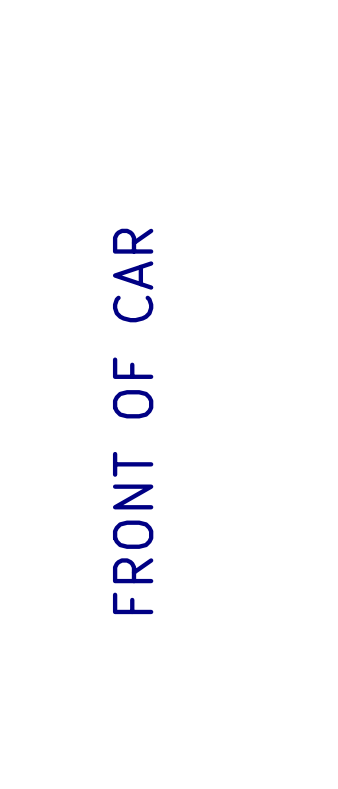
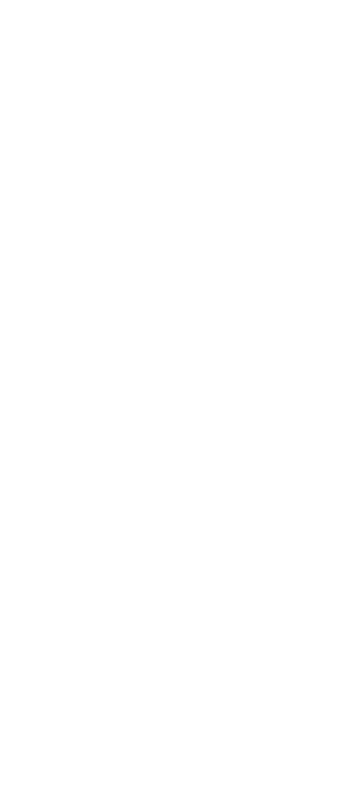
text: FRONT OF CAR (133, 421) -> none

